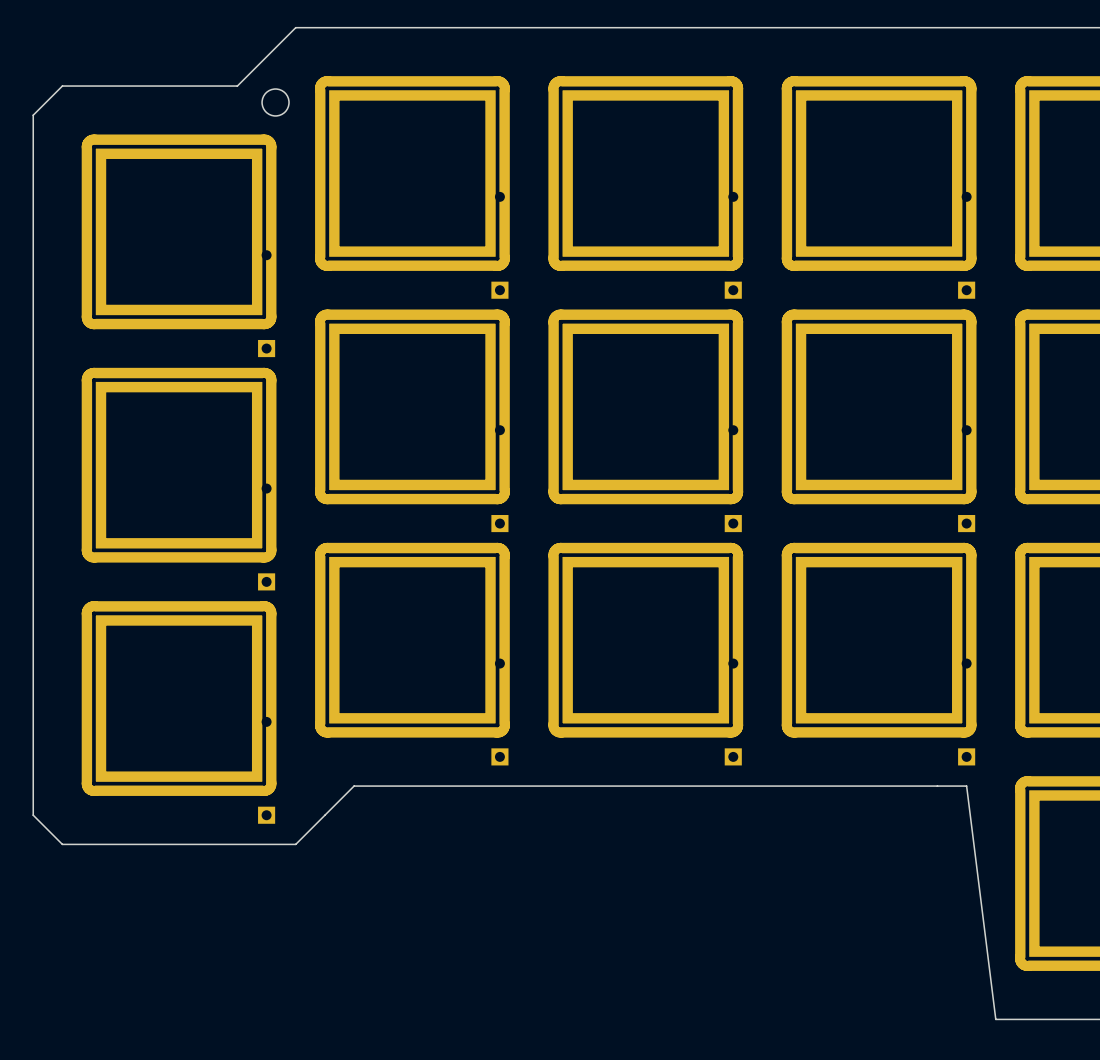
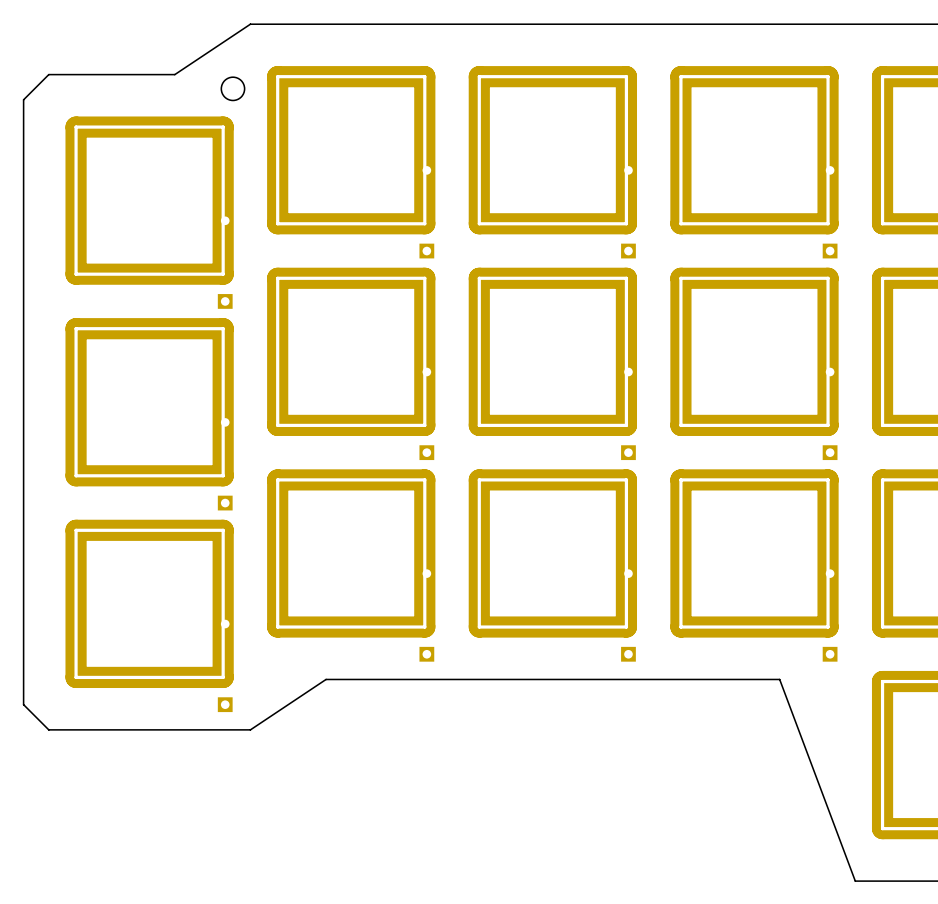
board edge: (295, 27) (237, 86) (208, 86) -> (250, 24) (174, 74)
board edge: (383, 786) (354, 786) (295, 844) -> (326, 679) (250, 729)
board edge: (908, 786) (966, 786) (995, 1019) -> (779, 679) (855, 881)

